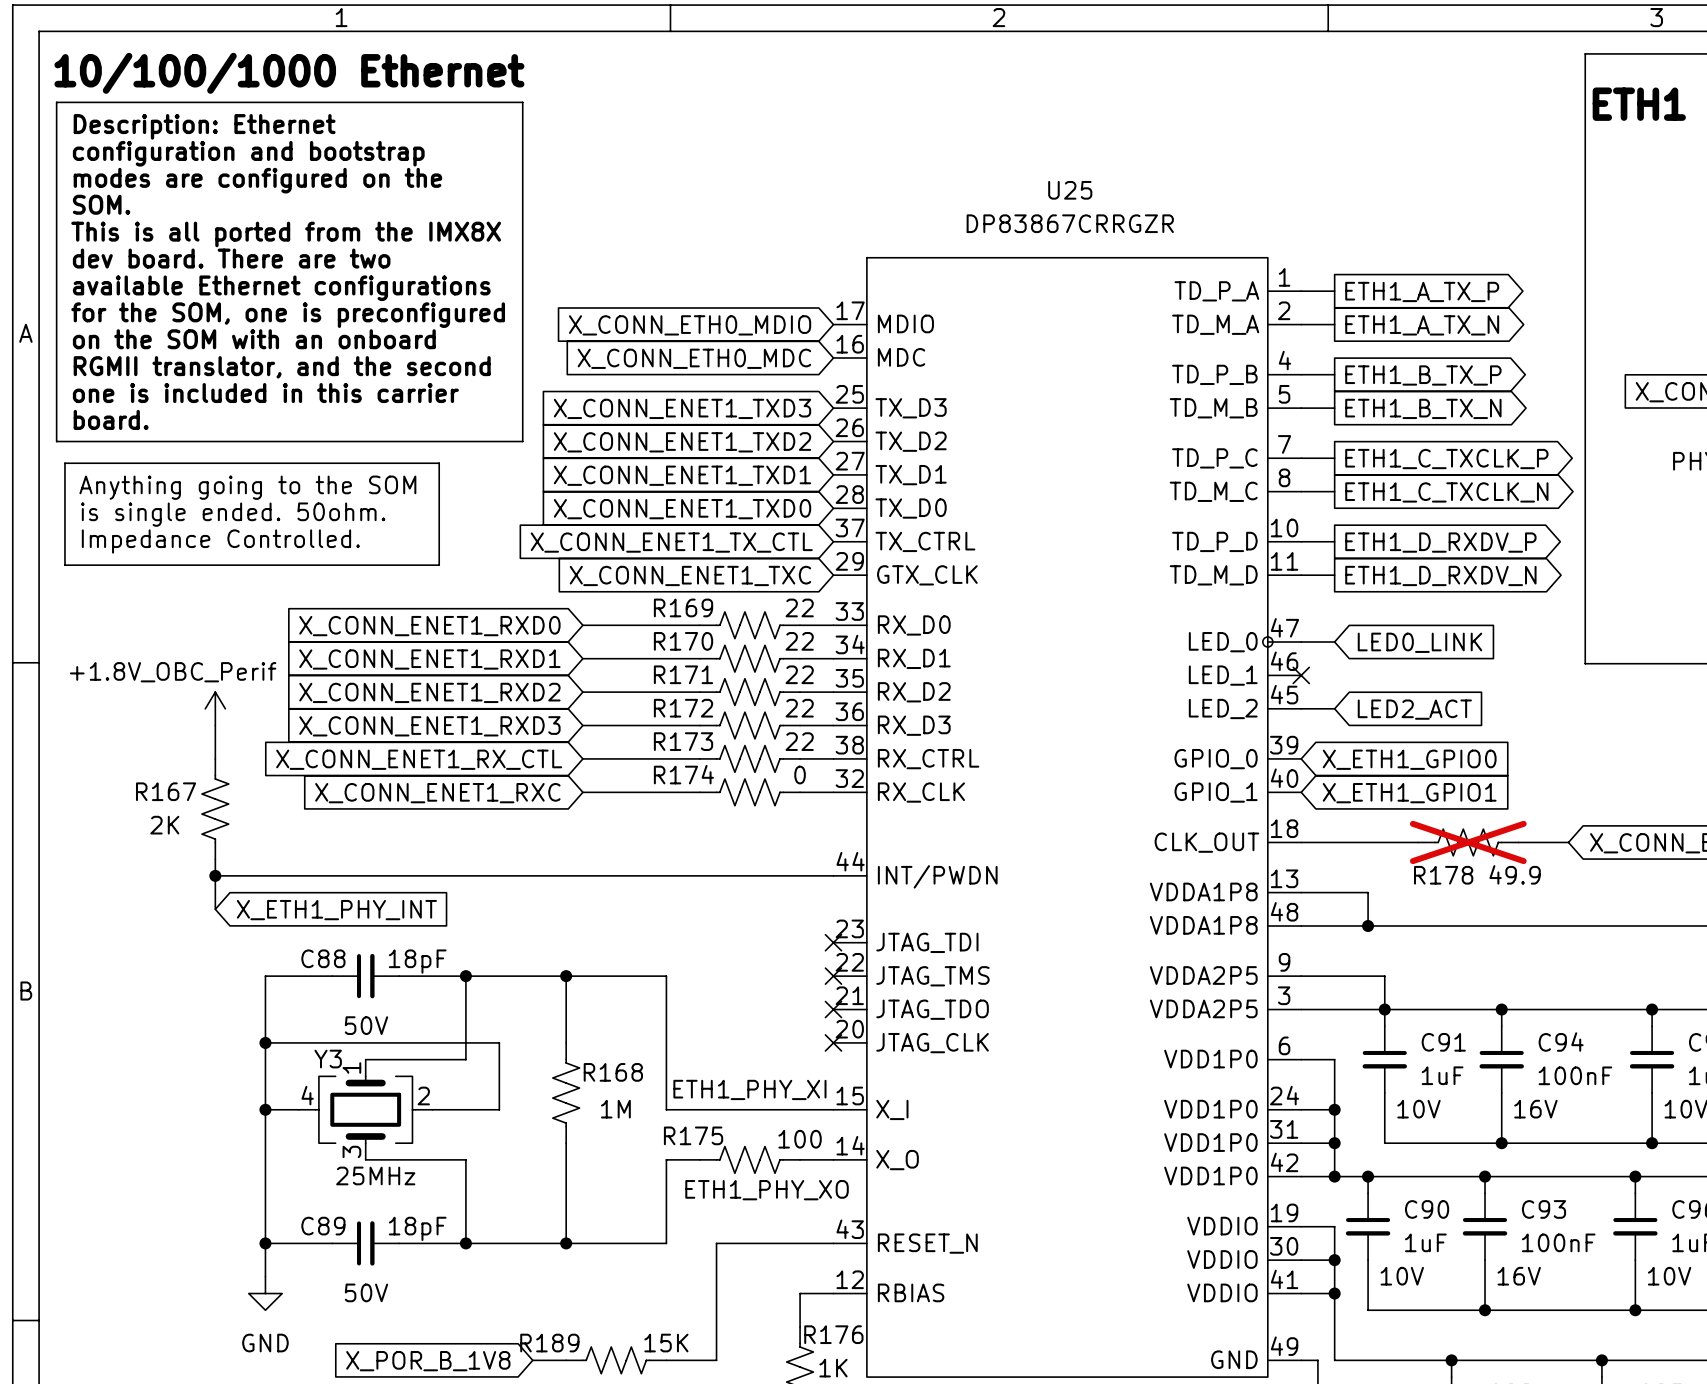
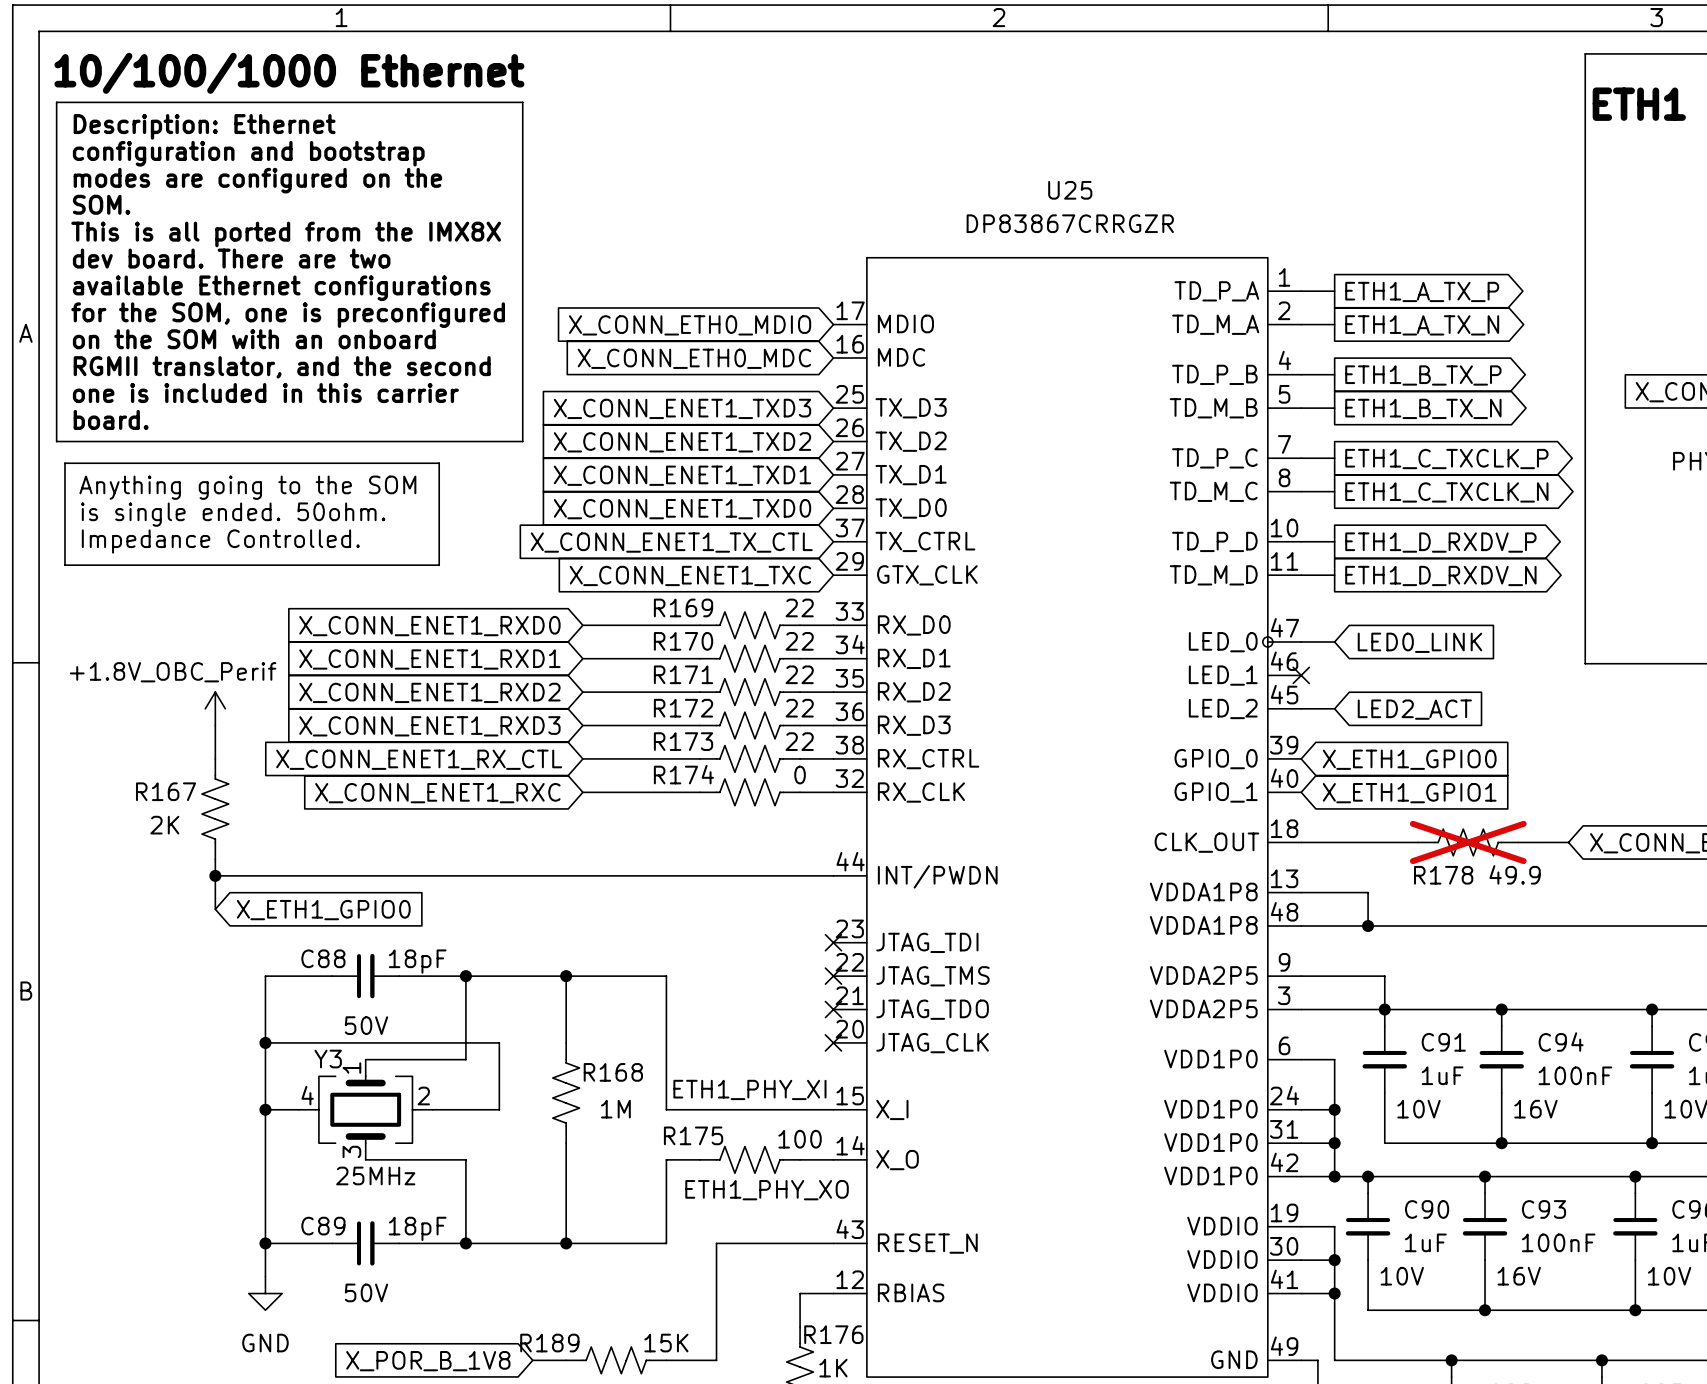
global label: X_ETH1_PHY_INT (336, 910) -> X_ETH1_GPIO0 (323, 910)

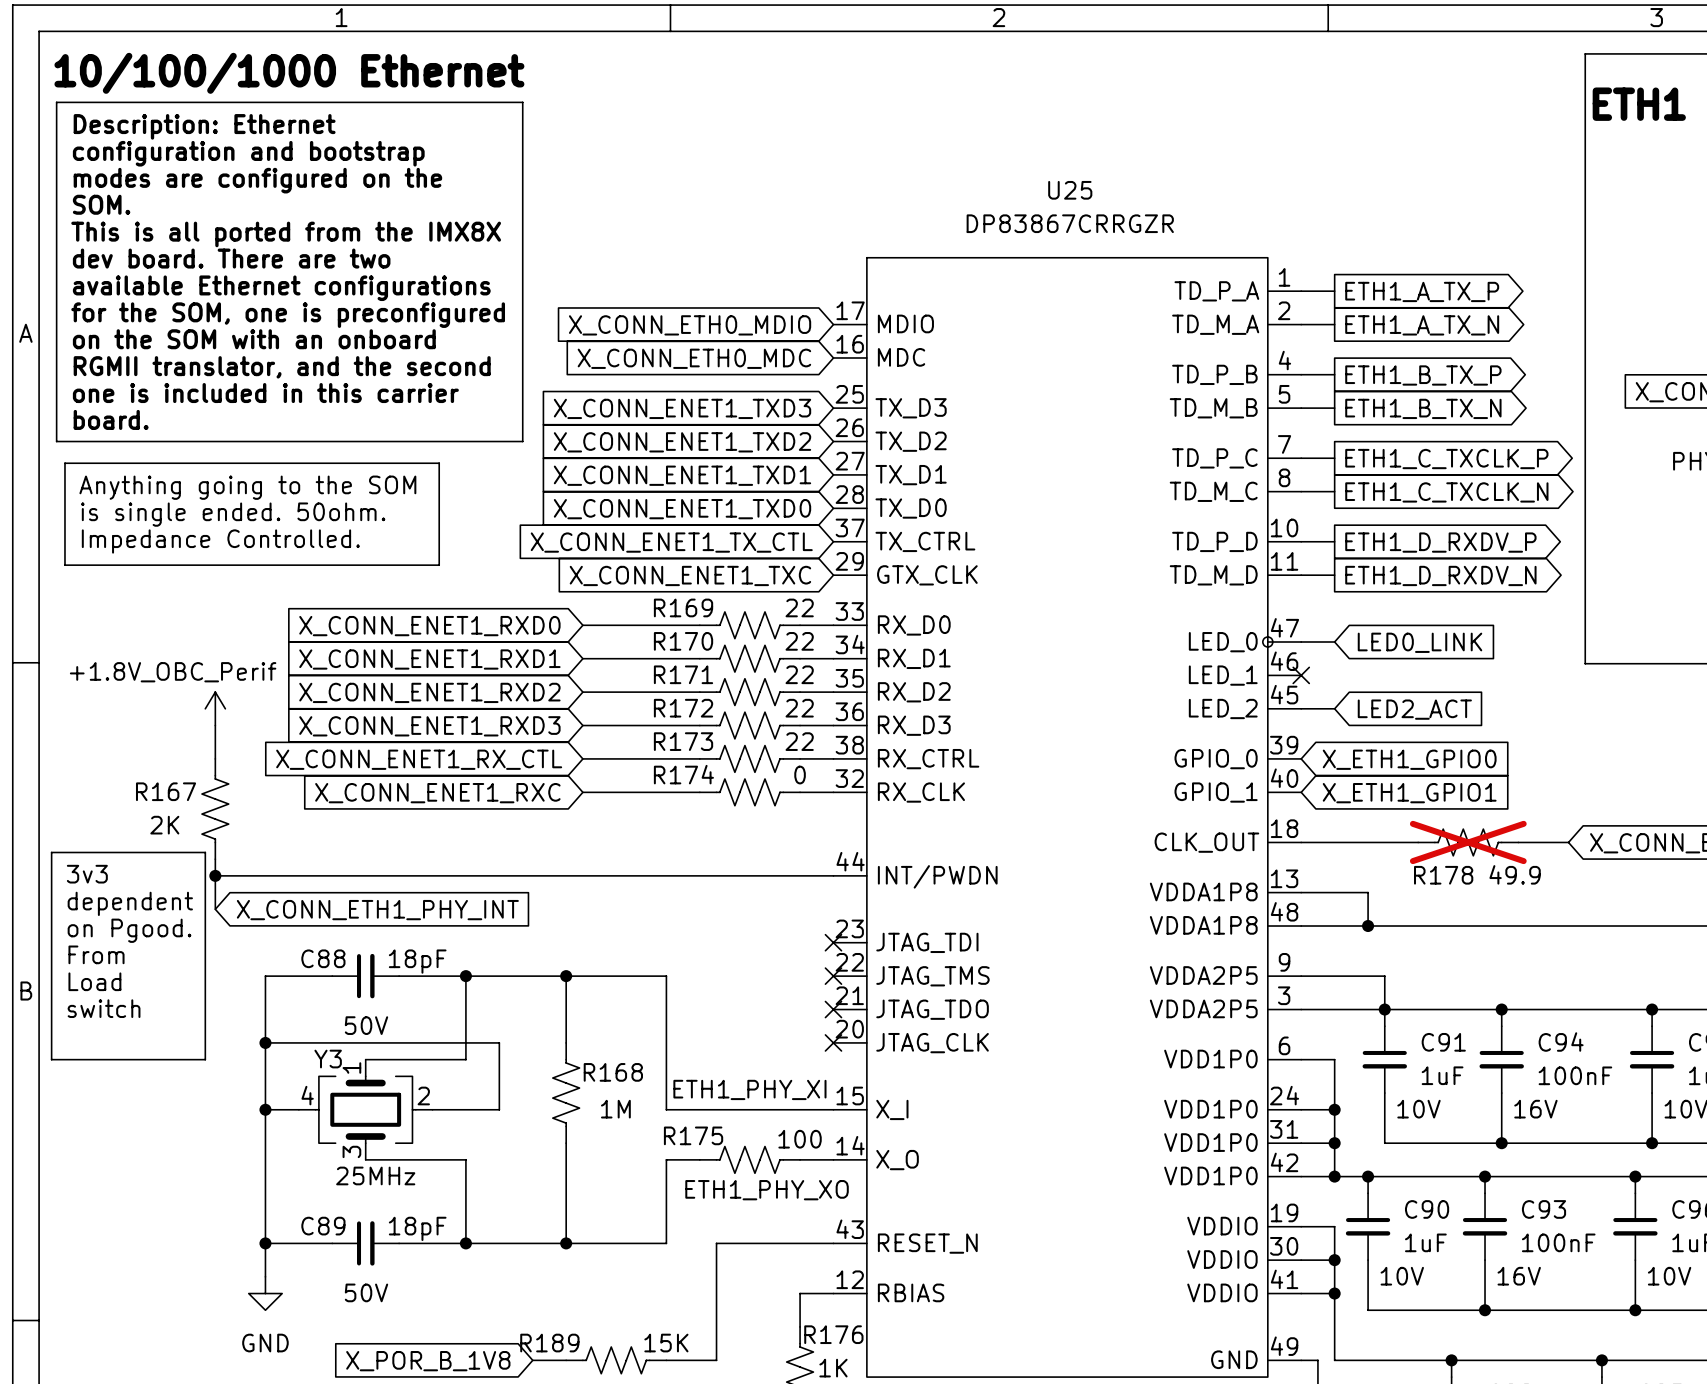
line: none -> (51, 852) (205, 852) (205, 1059) (51, 1059) (51, 852)
text: none -> 3v3 (87, 874)
text: none -> dependent (130, 903)
global label: X_ETH1_GPIO0 (323, 910) -> X_CONN_ETH1_PHY_INT (377, 910)
text: none -> on Pgood. (129, 930)
text: none -> From (96, 954)
text: none -> Load (94, 981)
text: none -> switch (104, 1008)

